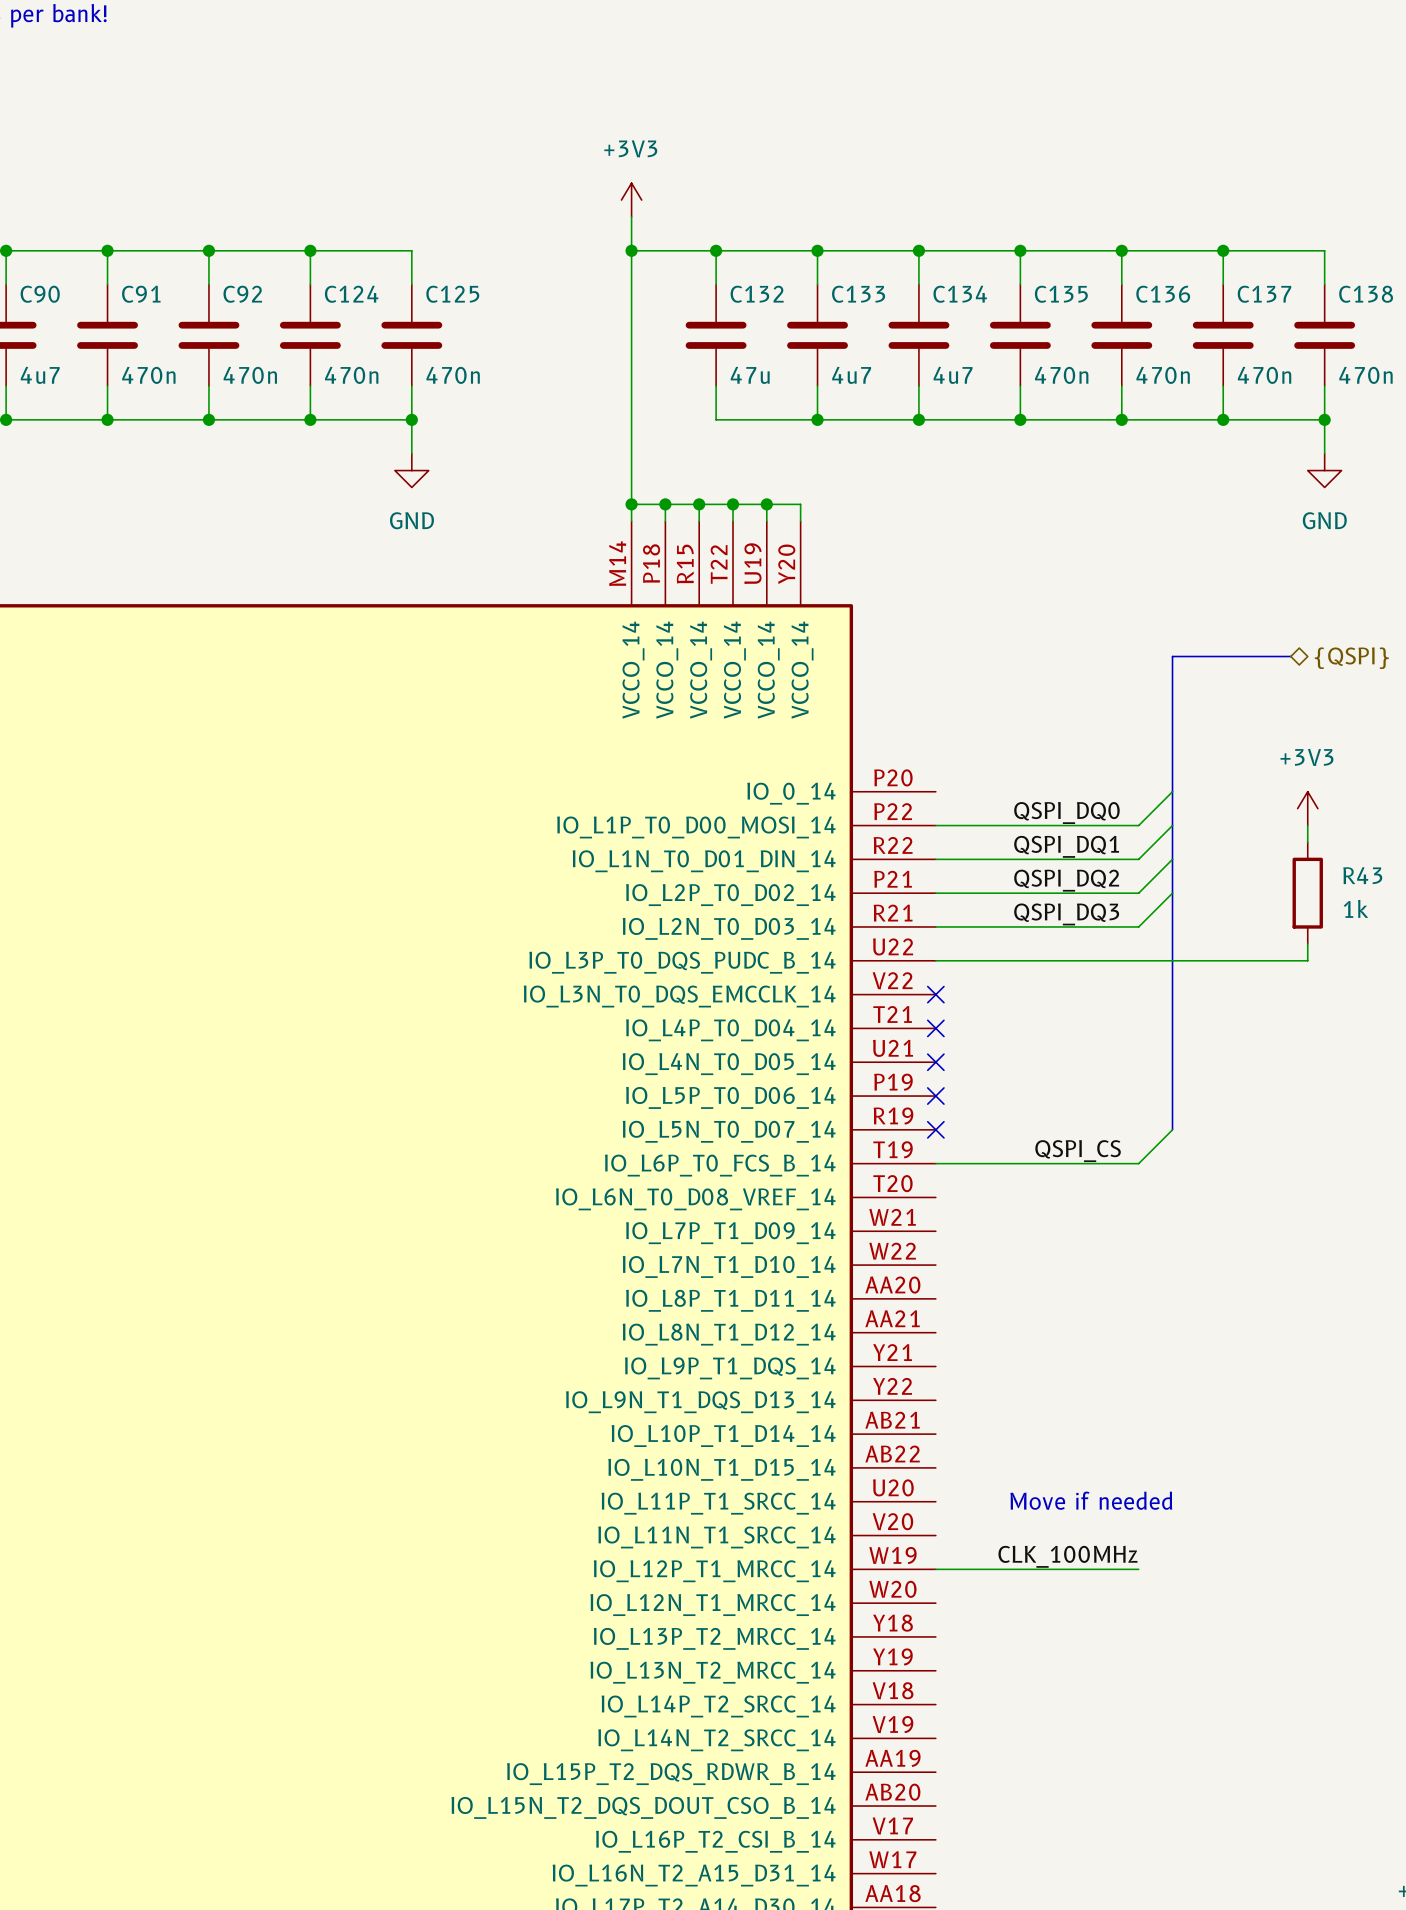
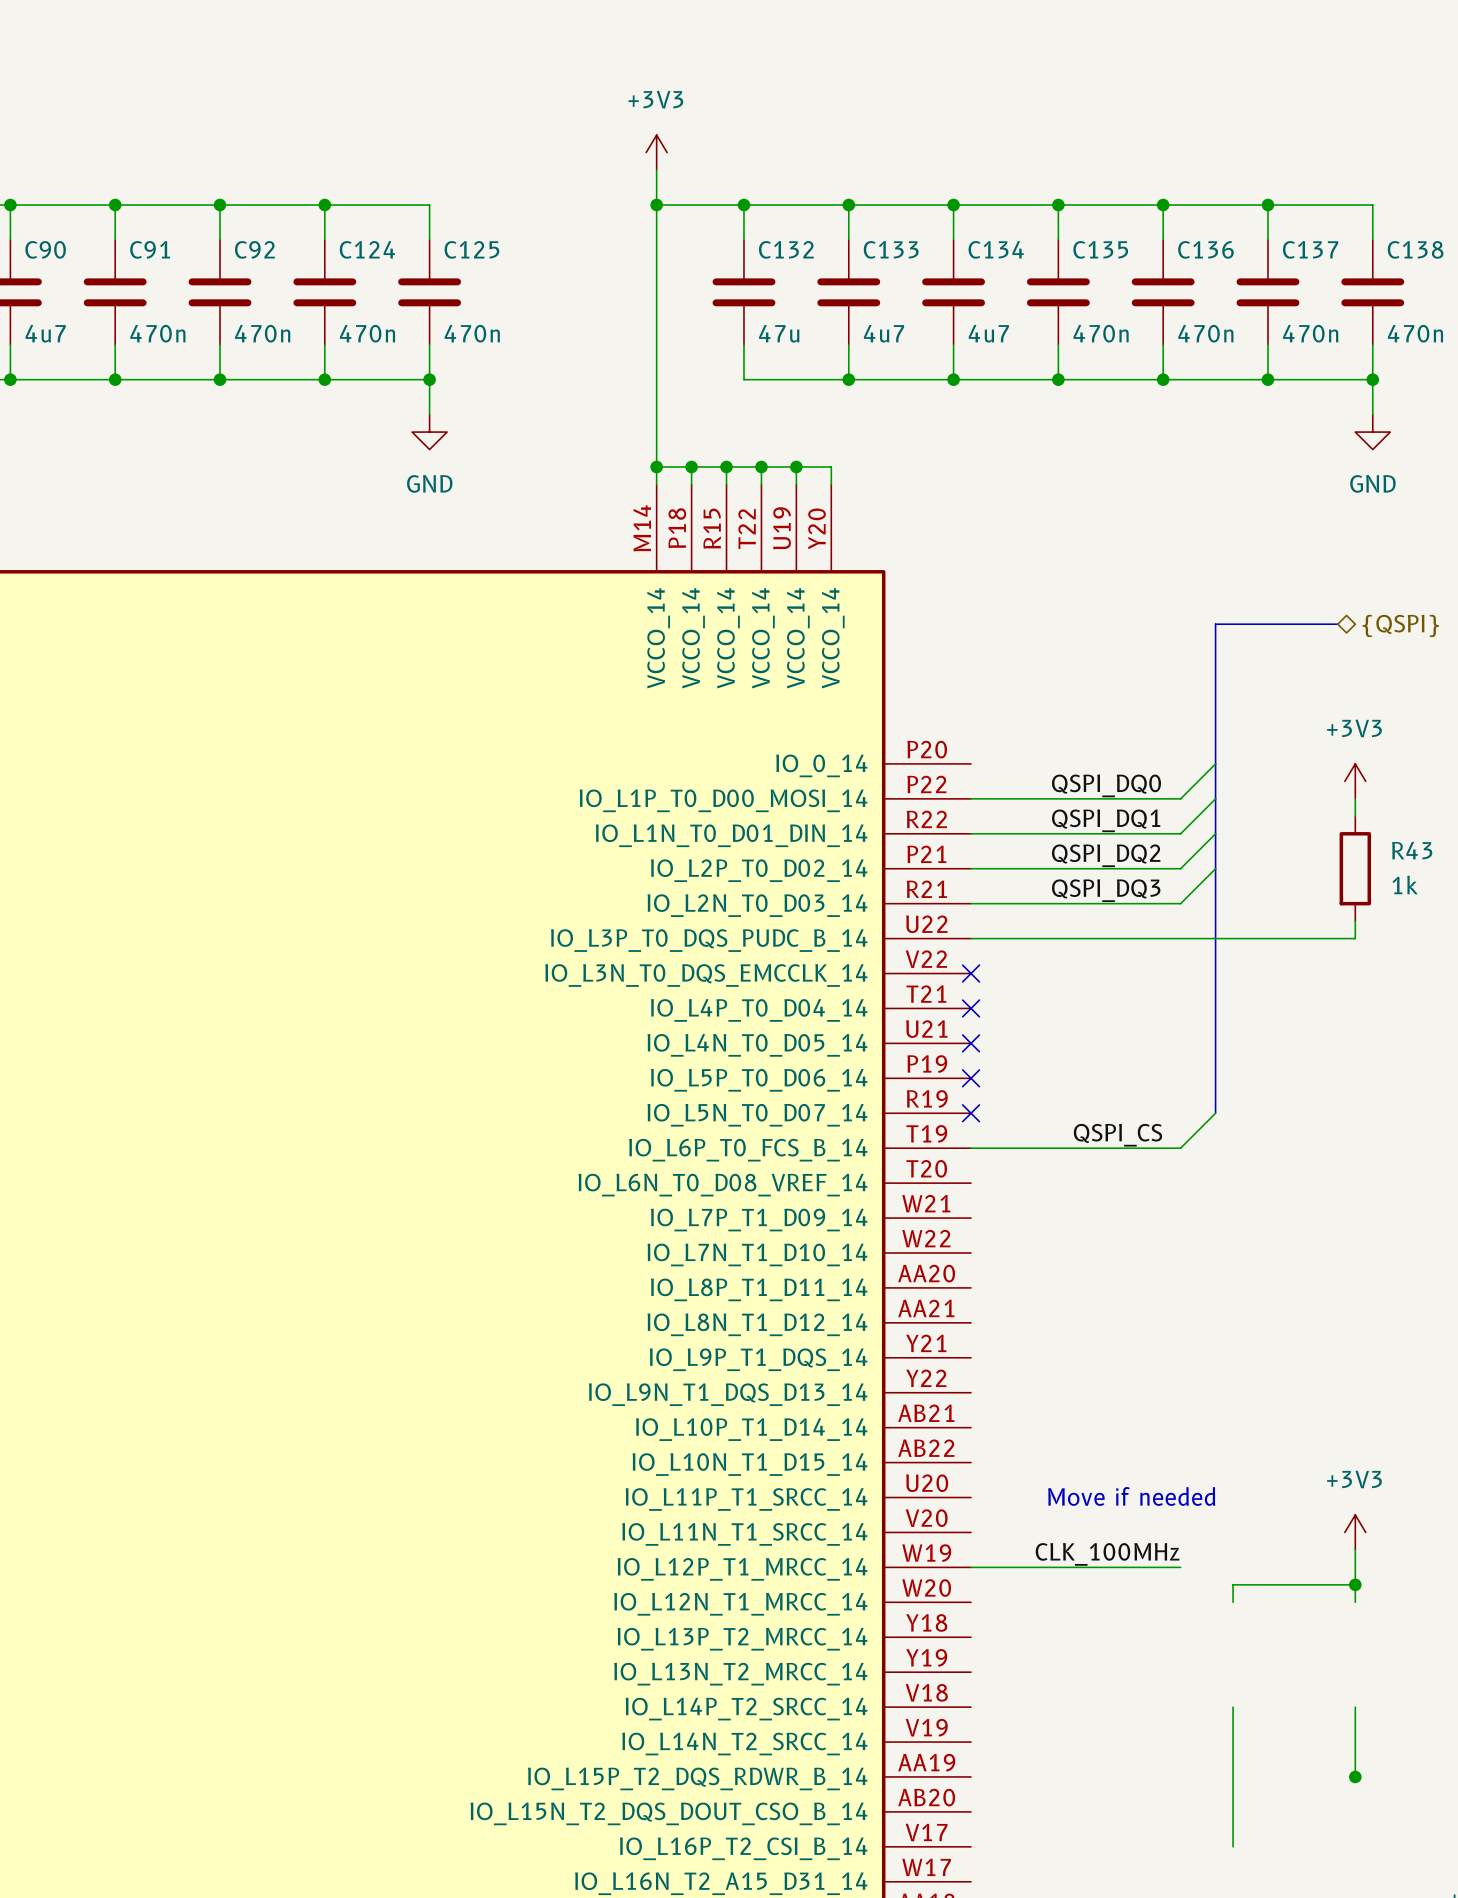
power symbol: none -> +3V3 (1355, 1532)
wire: none -> (1355, 1549) (1355, 1602)
wire: none -> (1355, 1584) (1233, 1584) (1233, 1602)
junction: none -> (1355, 1584)
wire: none -> (1233, 1707) (1233, 1846)
wire: none -> (1355, 1707) (1355, 1776)
junction: none -> (1355, 1776)

